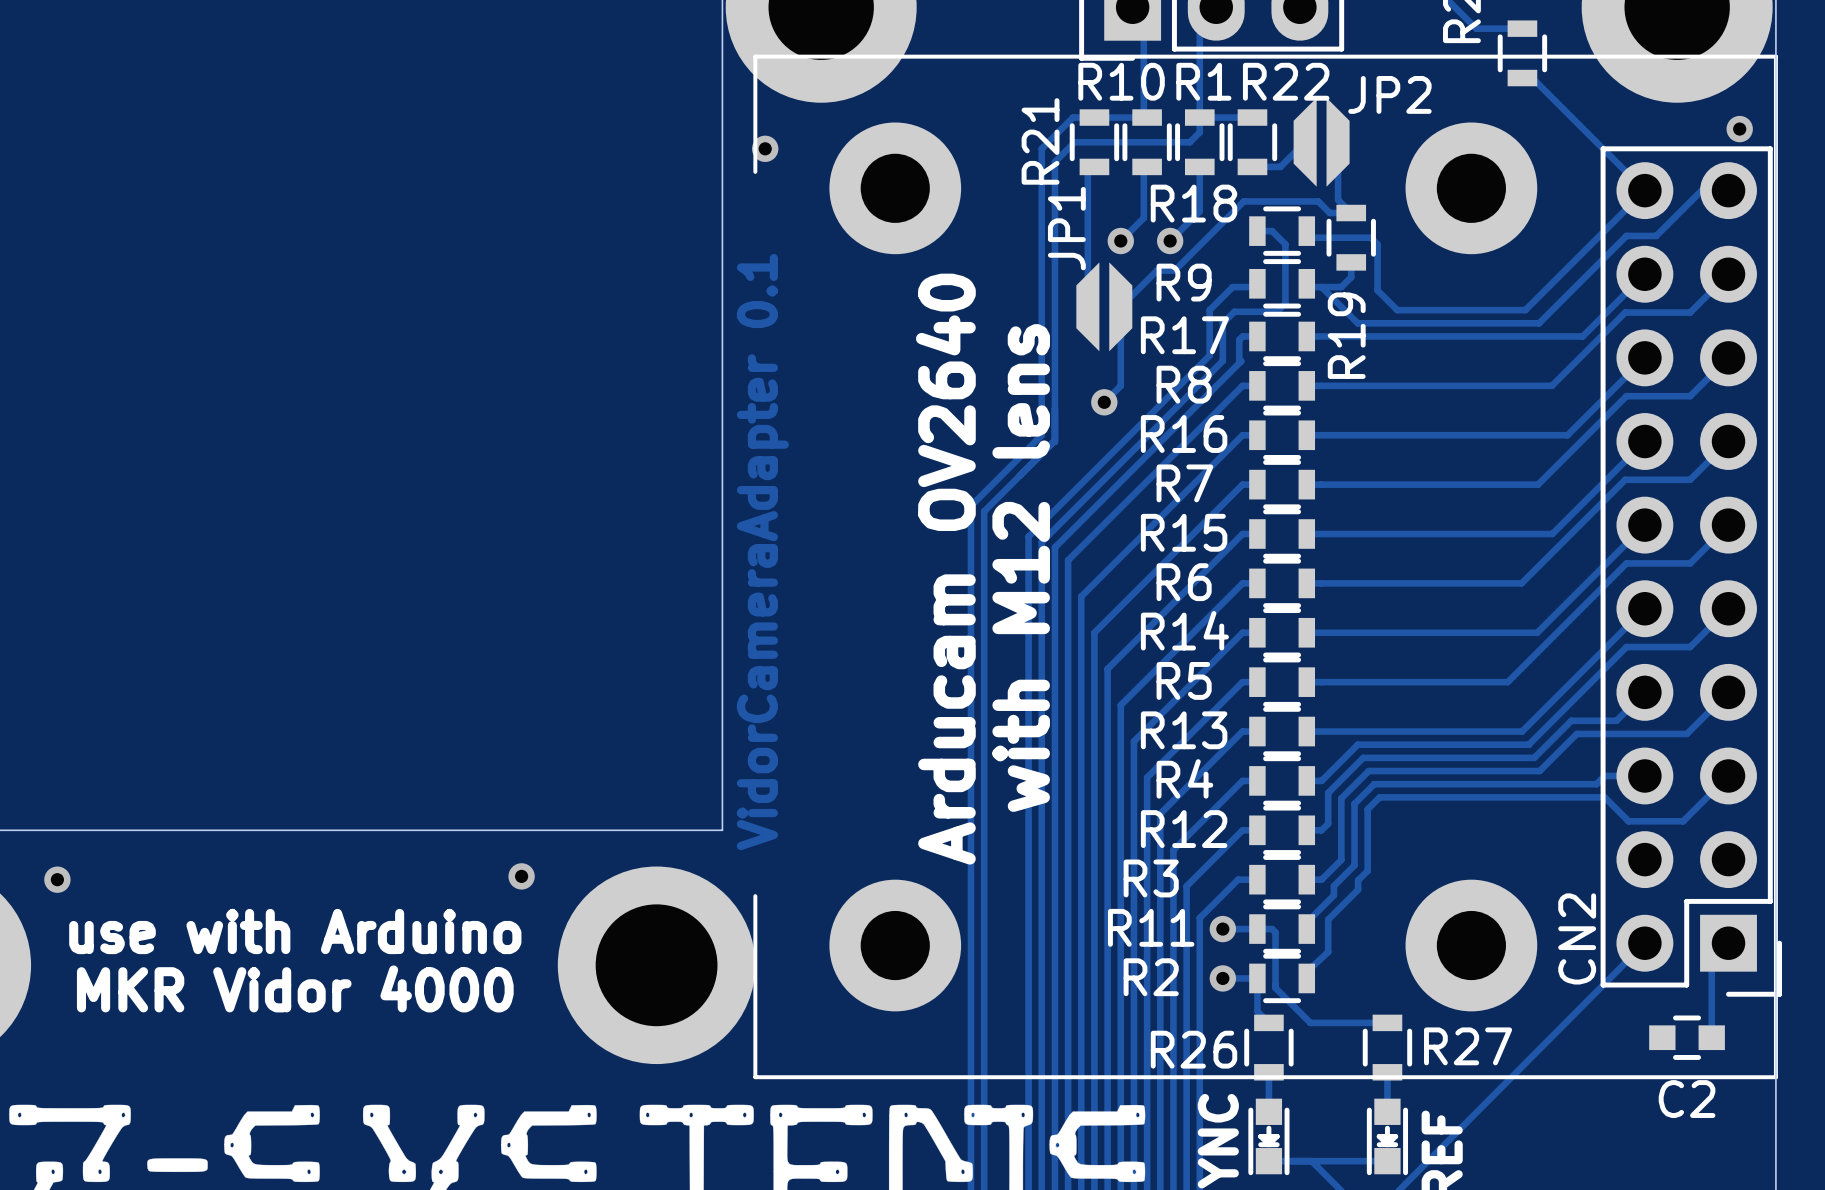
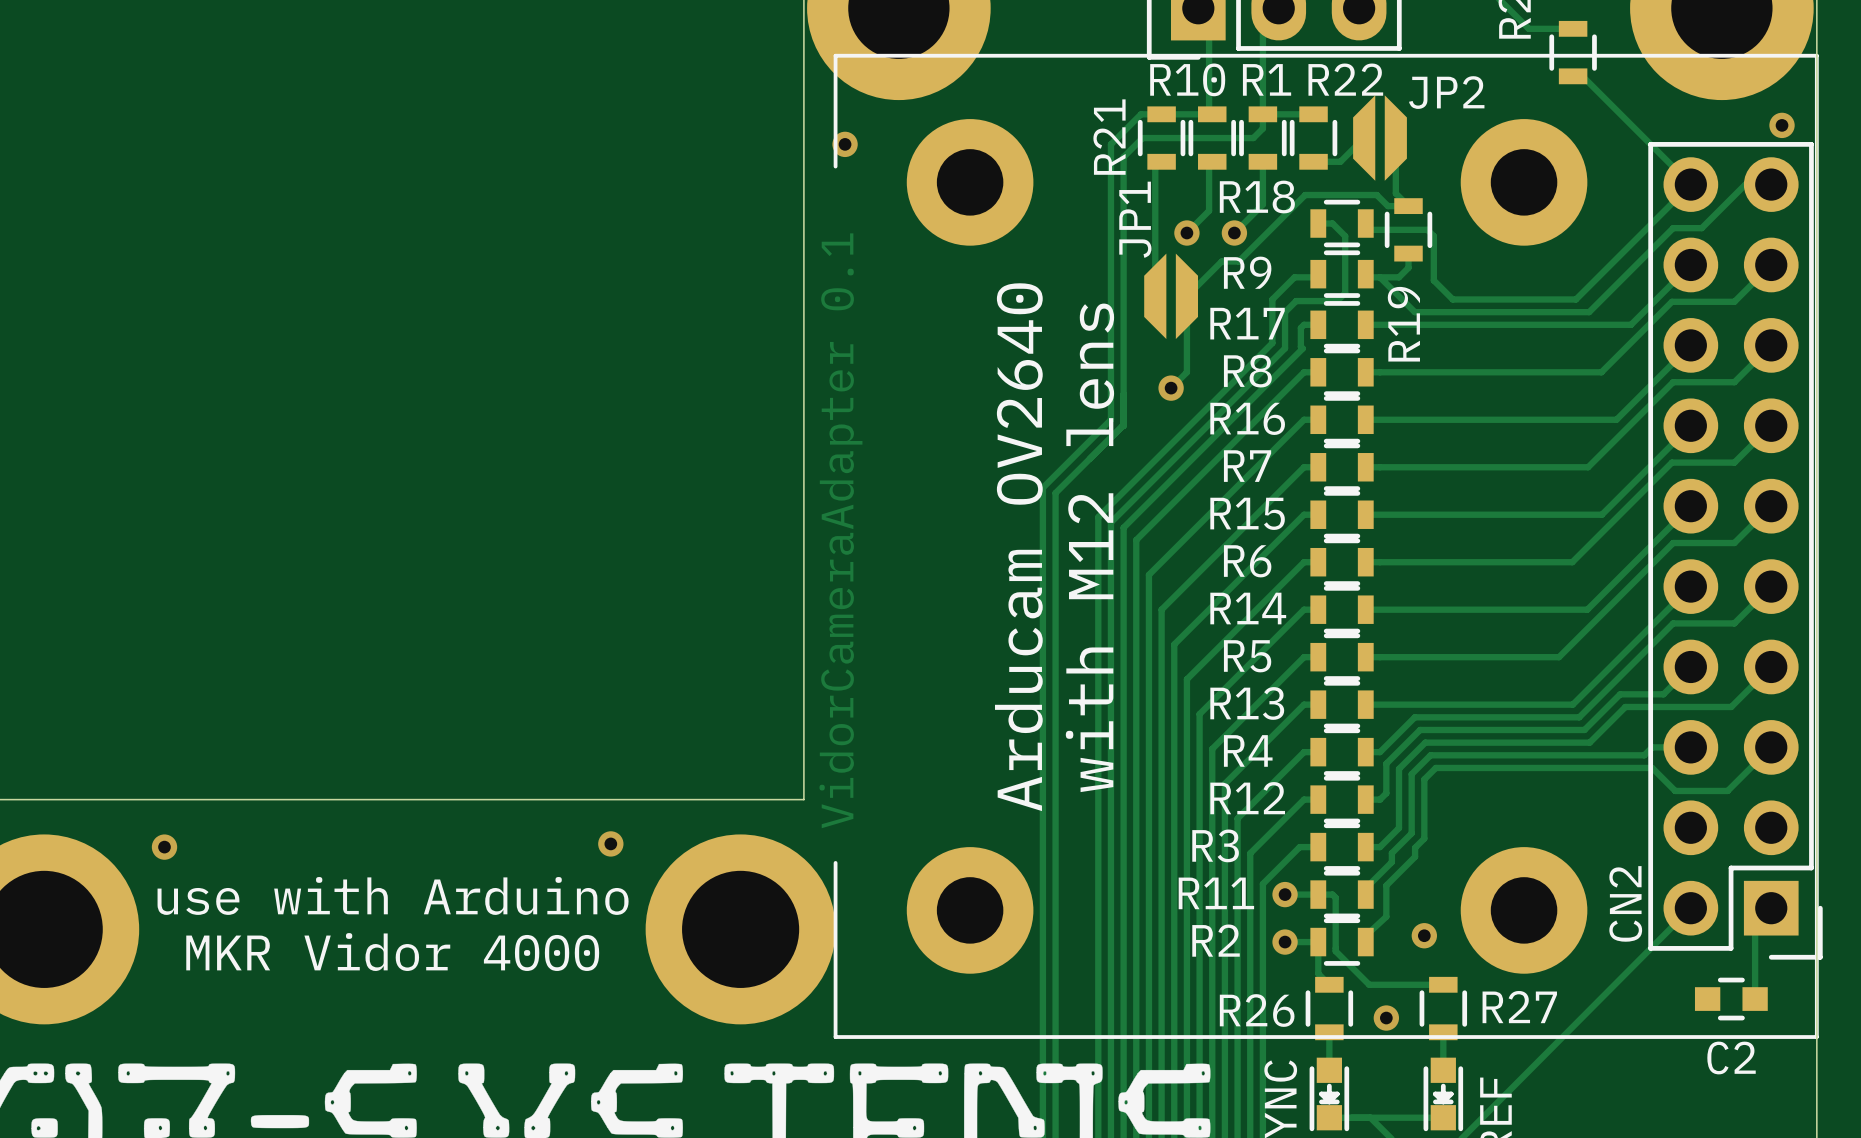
via: none -> (1424, 935)
via: none -> (1386, 1018)

